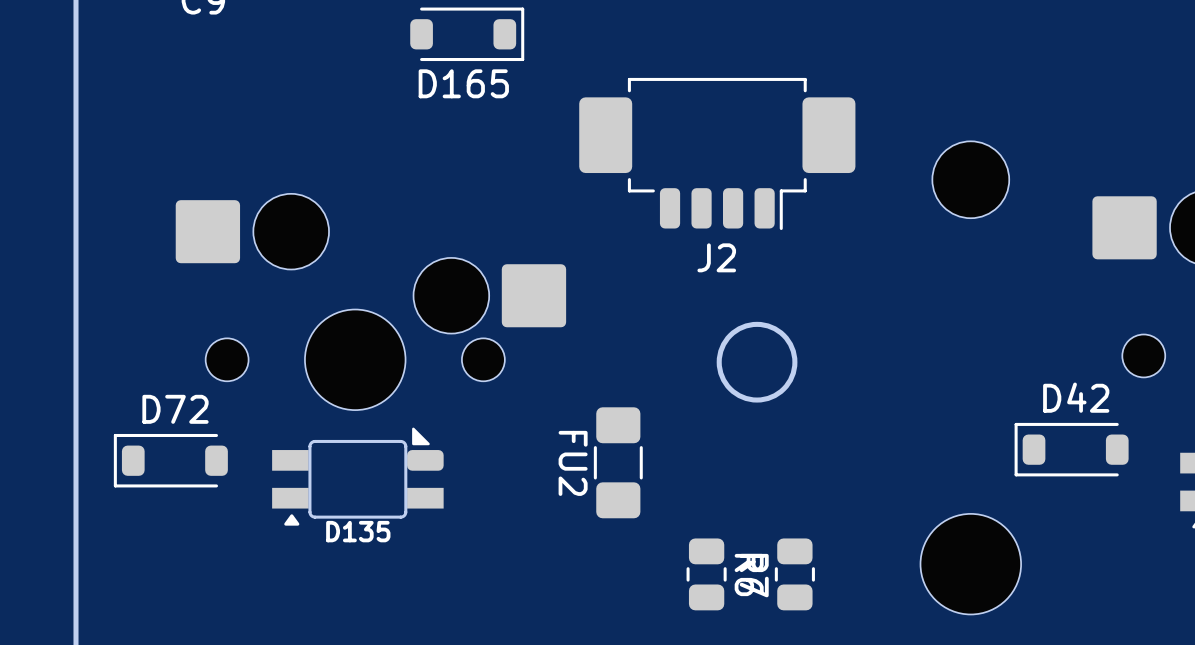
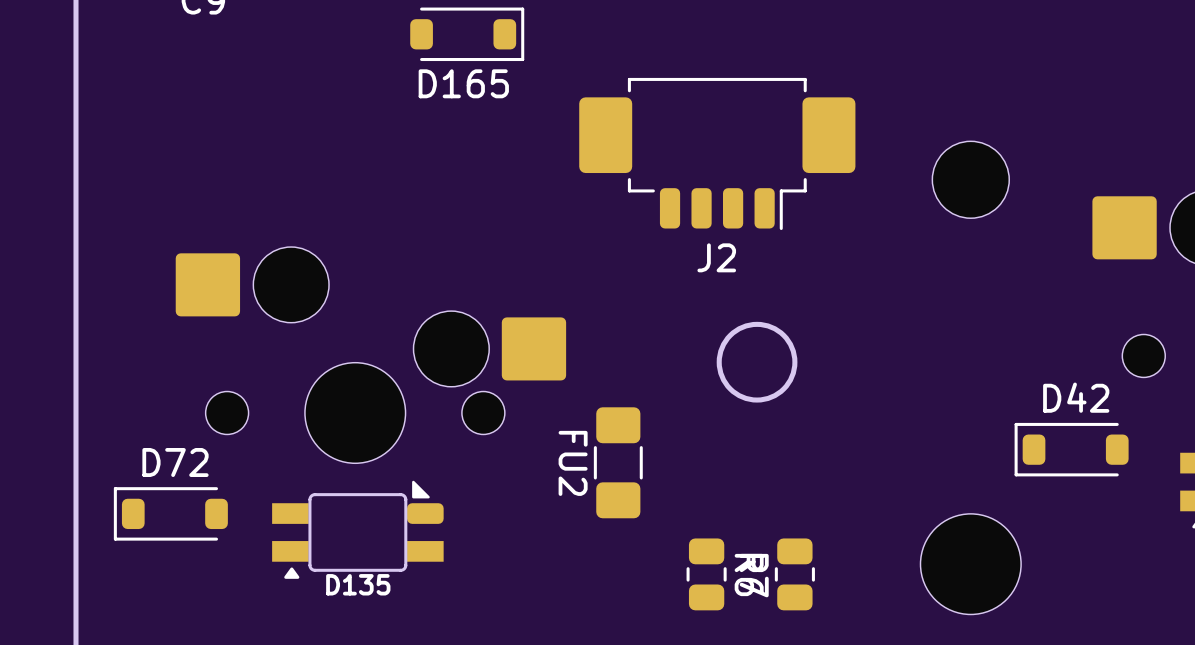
part position: (370, 301) -> (370, 355)
D72 position: (170, 460) -> (170, 513)
D135 position: (357, 476) -> (357, 529)

